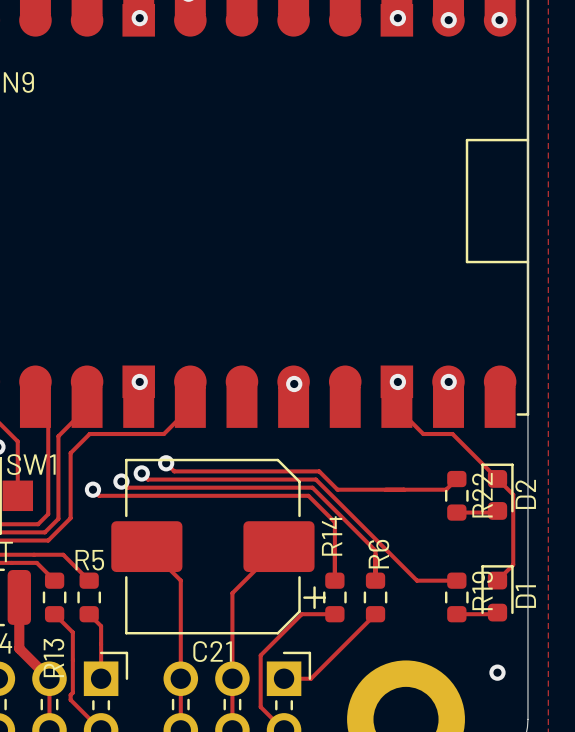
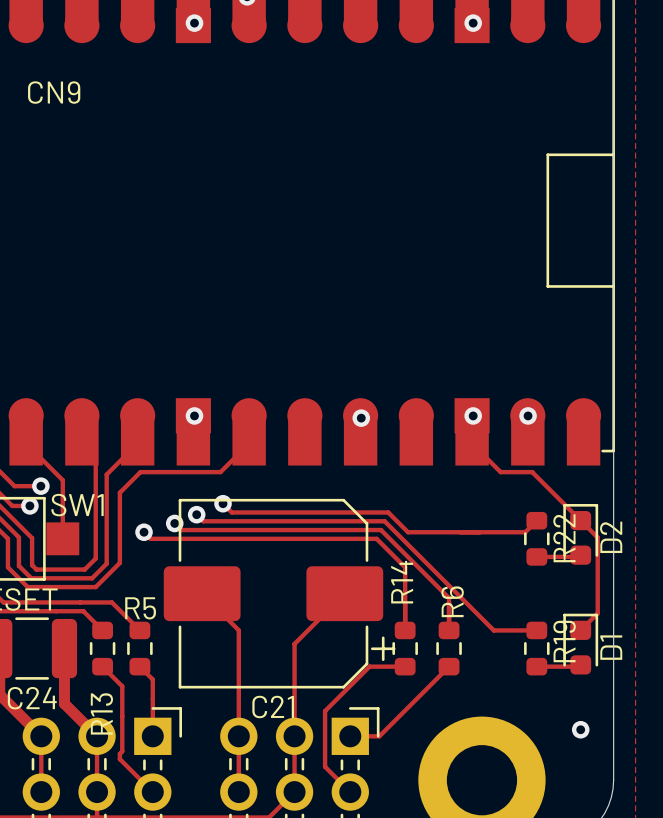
via: (448, 20) -> none
via: (499, 20) -> none

